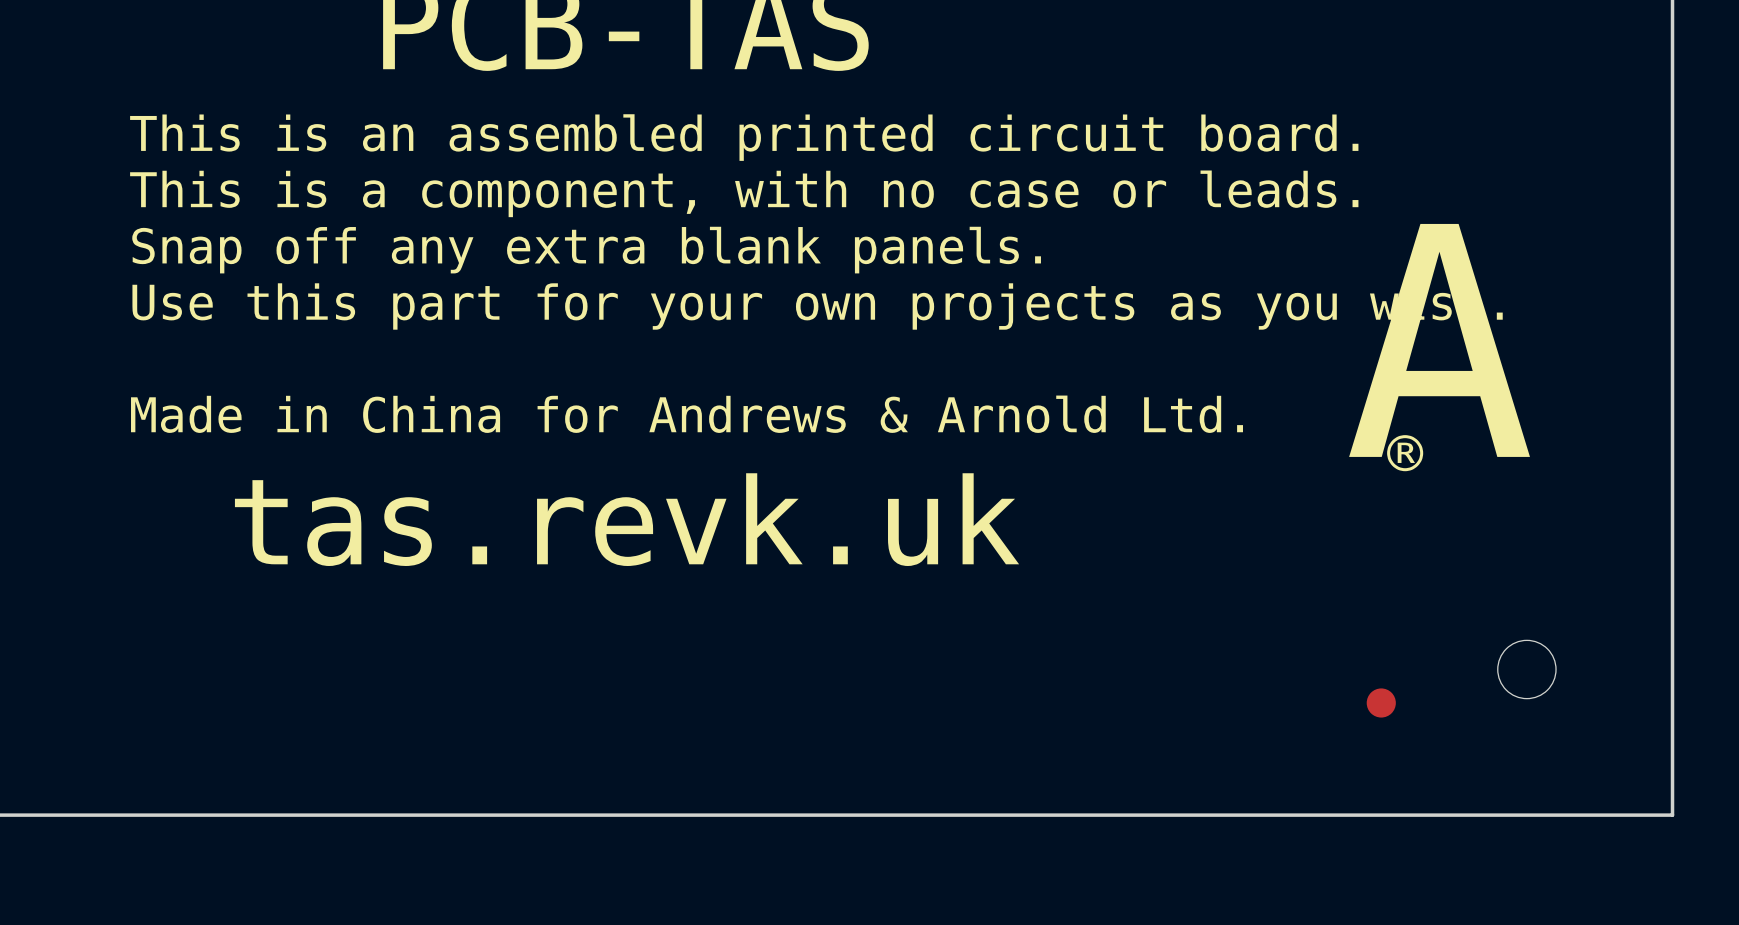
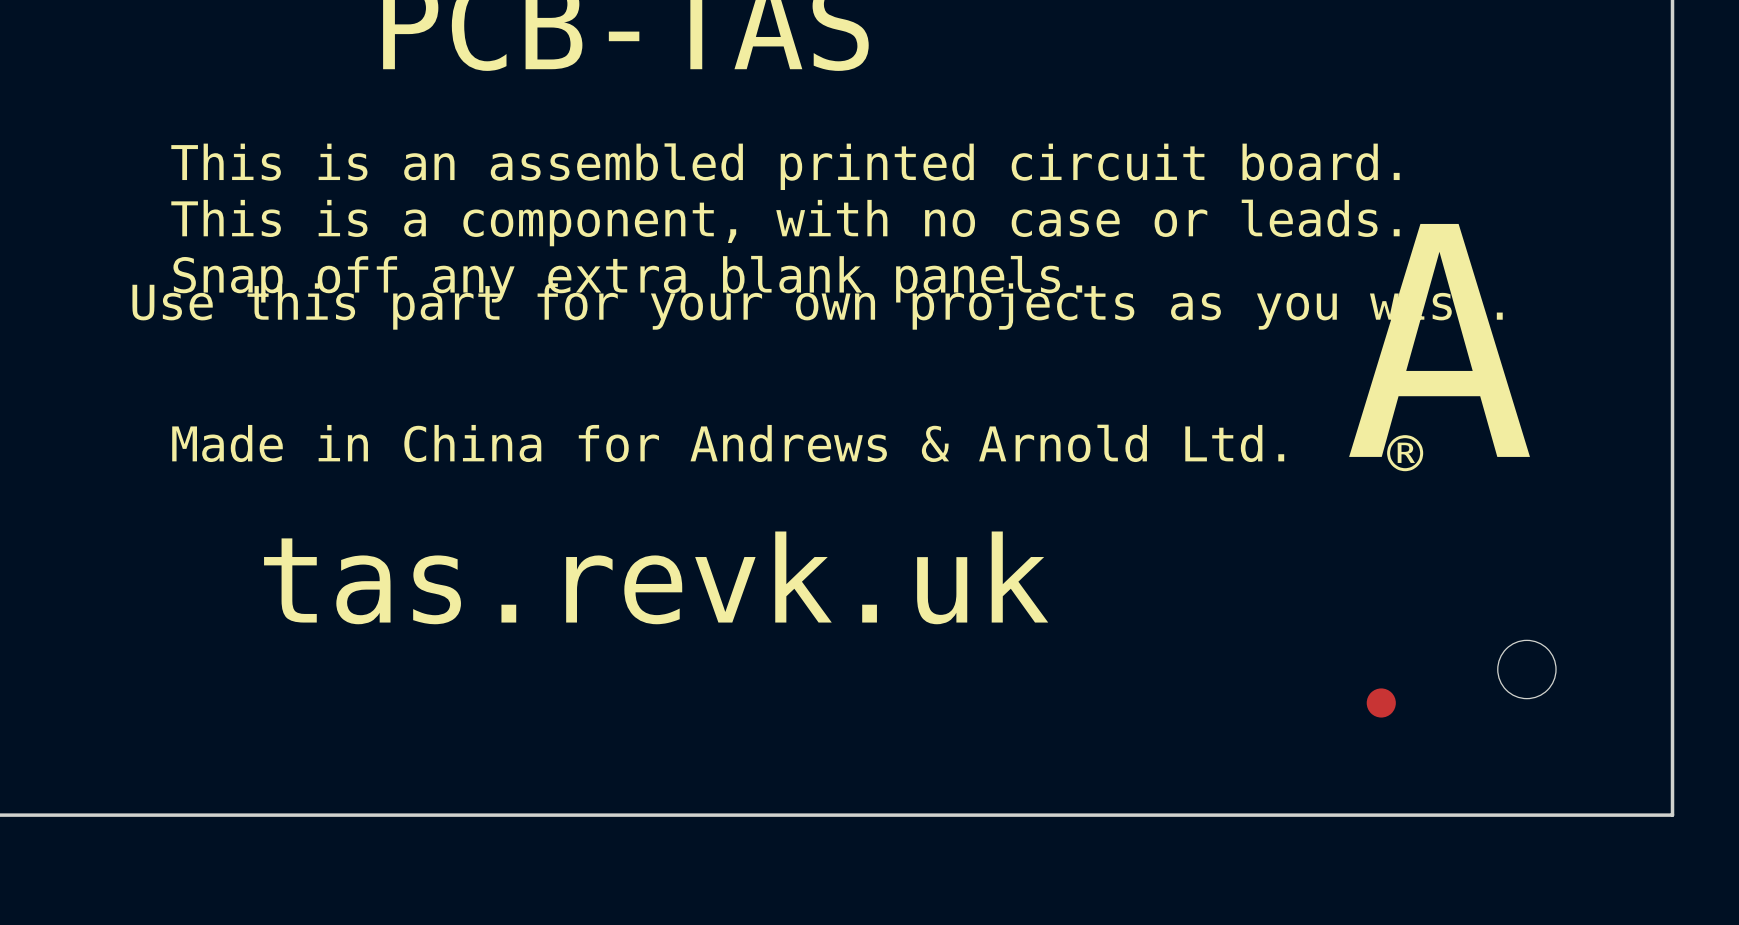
text position: This is an assembled printed circuit board. (744, 137) -> This is an assembled printed circuit board. (785, 166)
text position: This is a component, with no case or leads. (744, 193) -> This is a component, with no case or leads. (785, 222)
text position: Snap off any extra blank panels. (586, 250) -> Snap off any extra blank panels. (627, 279)
text position: Made in China for Andrews & Arnold Ltd. (687, 414) -> Made in China for Andrews & Arnold Ltd. (728, 443)
text position: tas.revk.uk (627, 519) -> tas.revk.uk (656, 577)

